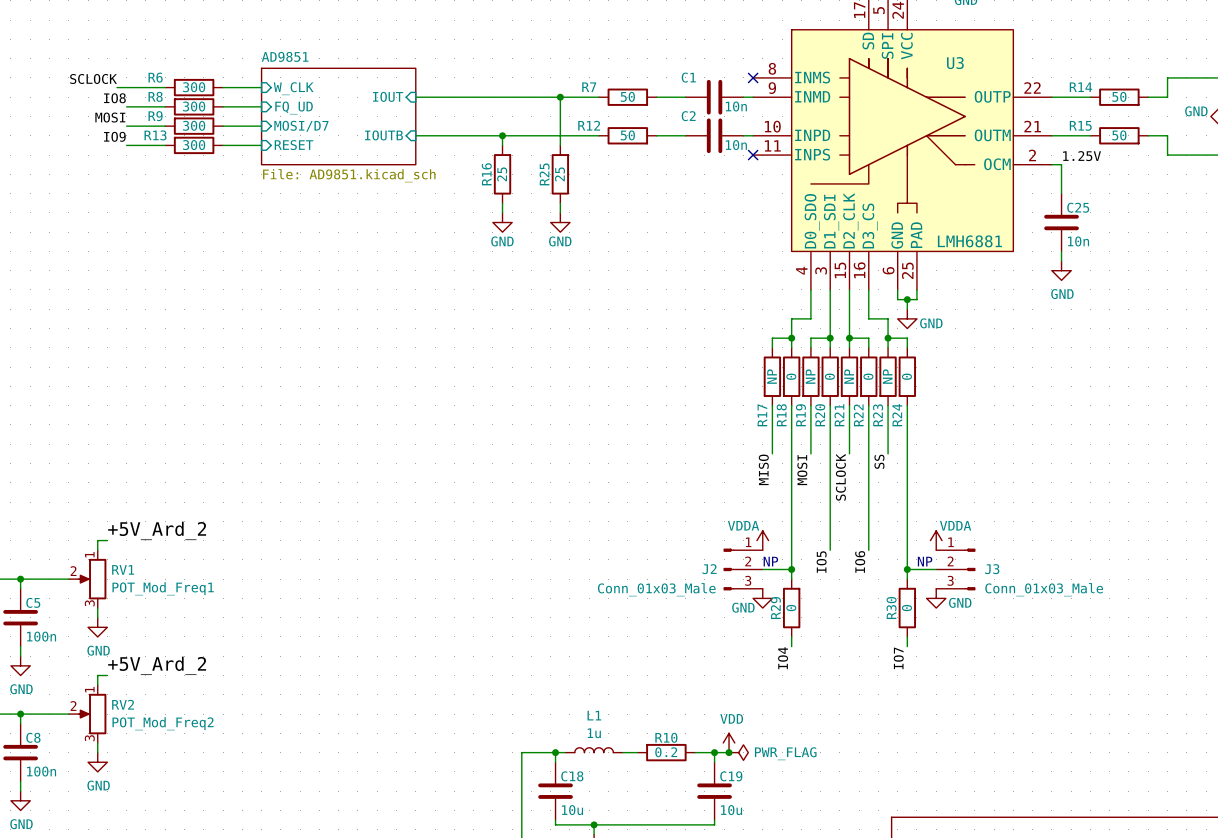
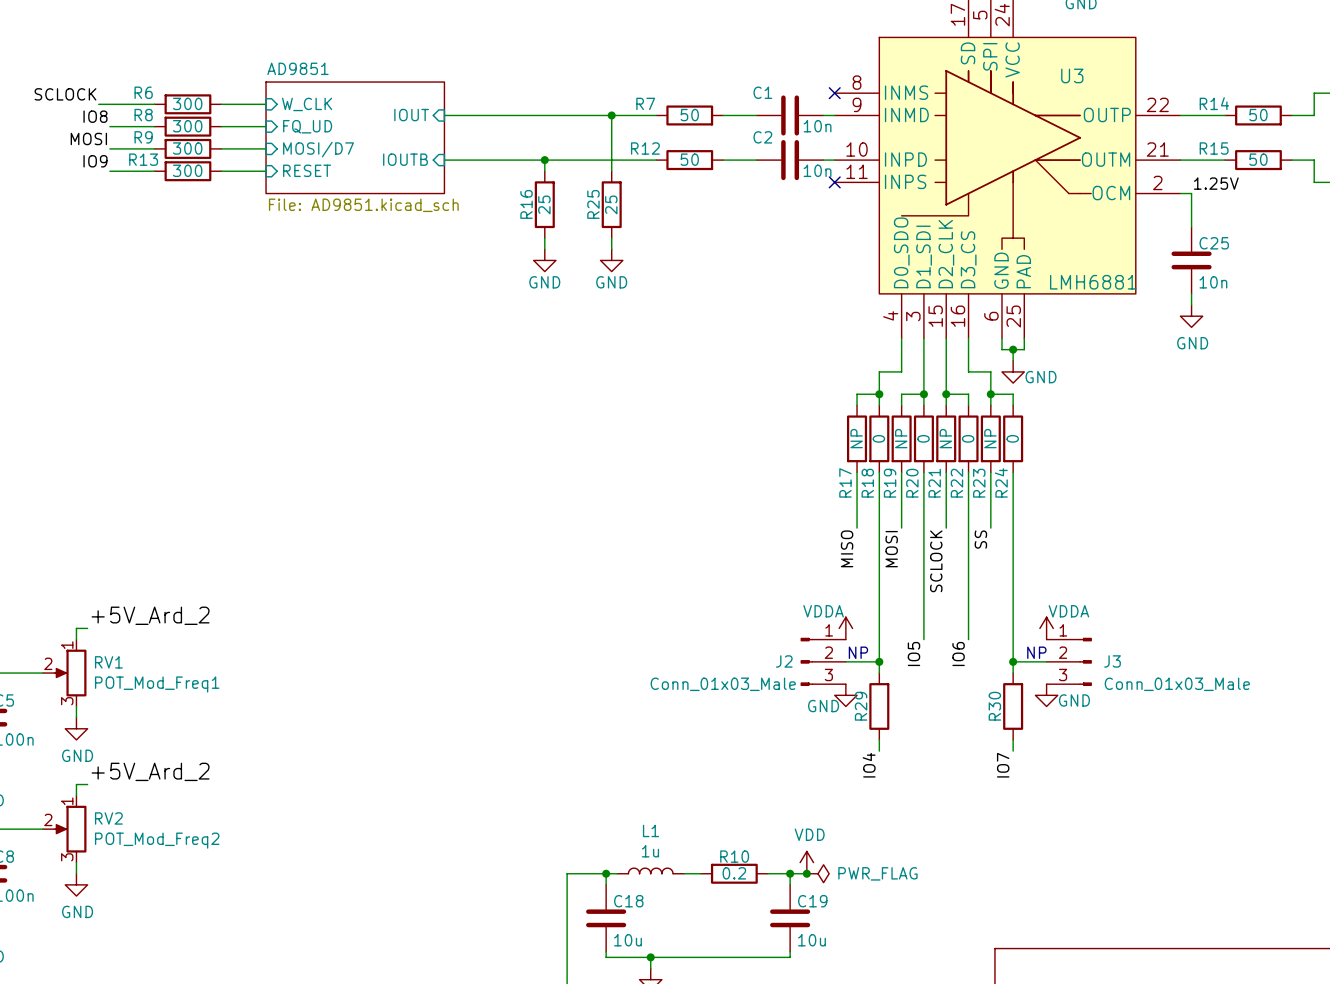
R29 value: 0 (791, 608) -> none
R30 value: 0 (906, 608) -> none

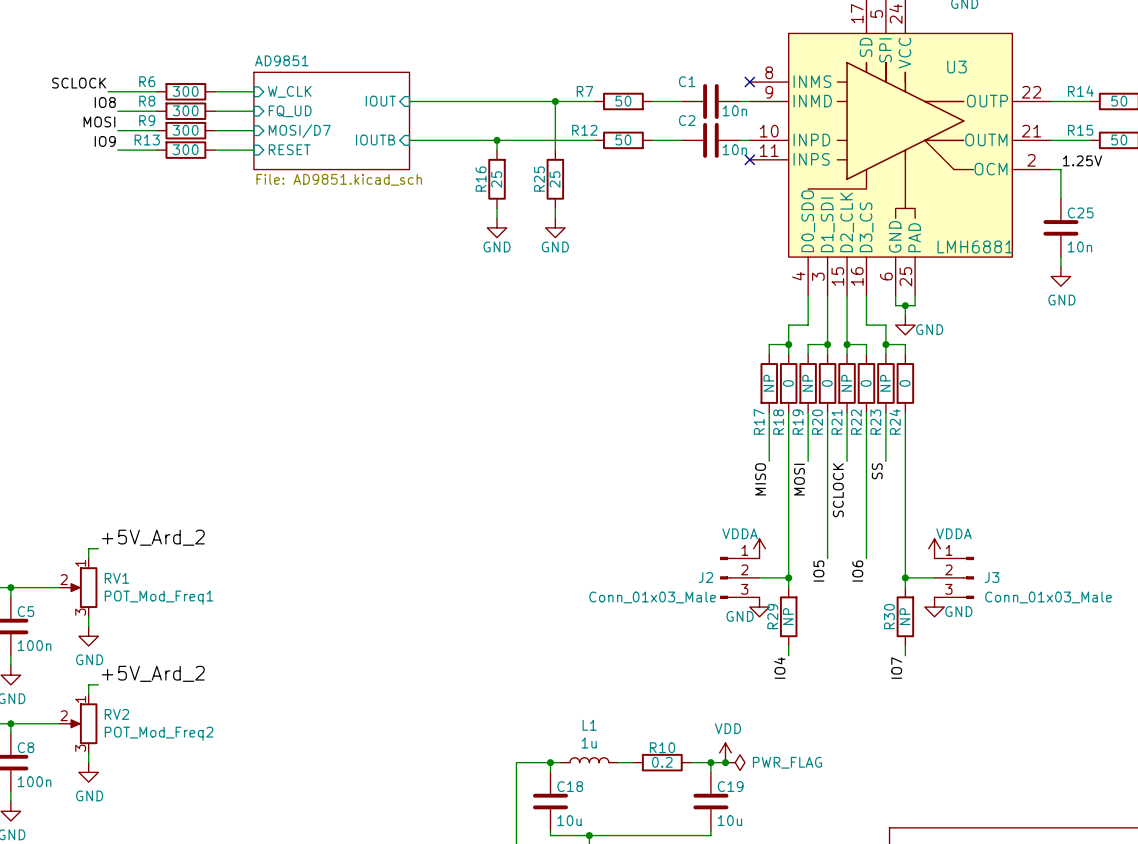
text: NP (858, 652) -> none
text: NP (1036, 652) -> none
R29 value: none -> NP (788, 616)
R30 value: none -> NP (905, 616)

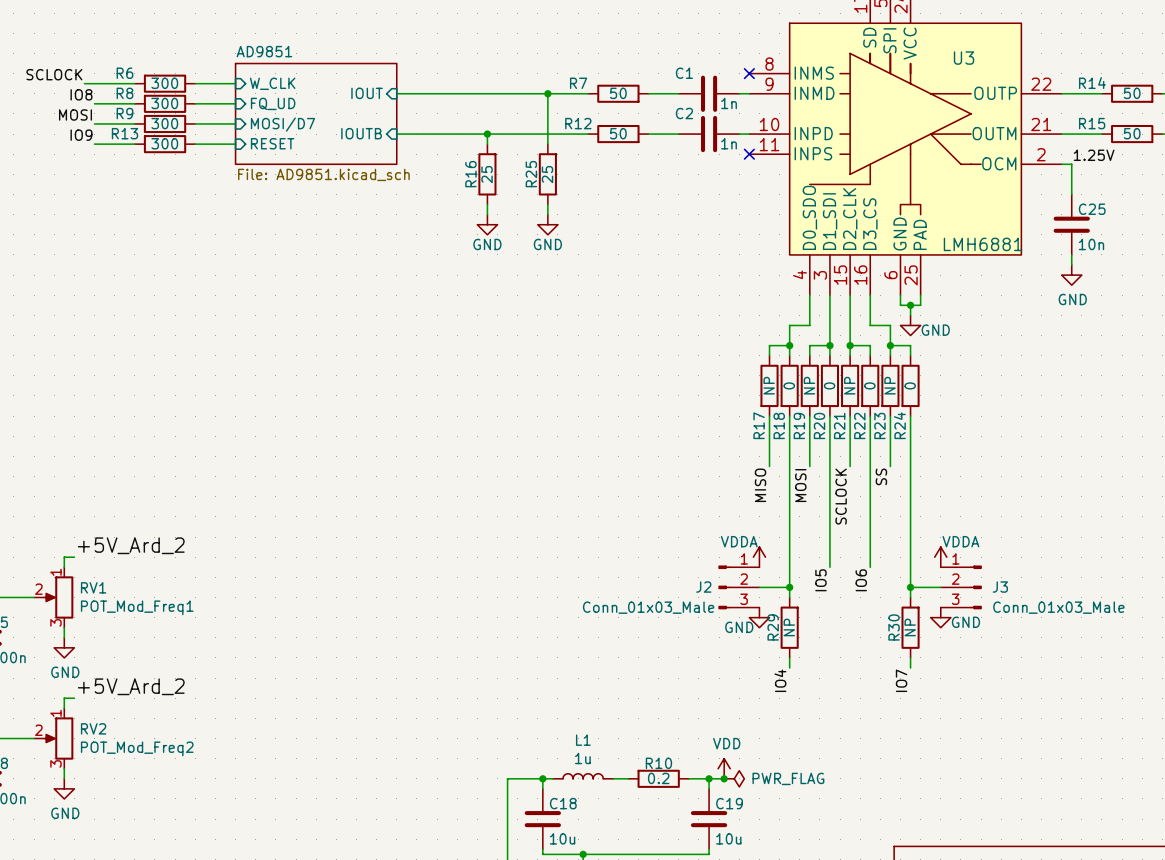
C1 value: 10n (734, 110) -> 1n (729, 103)
C2 value: 10n (734, 149) -> 1n (729, 143)

